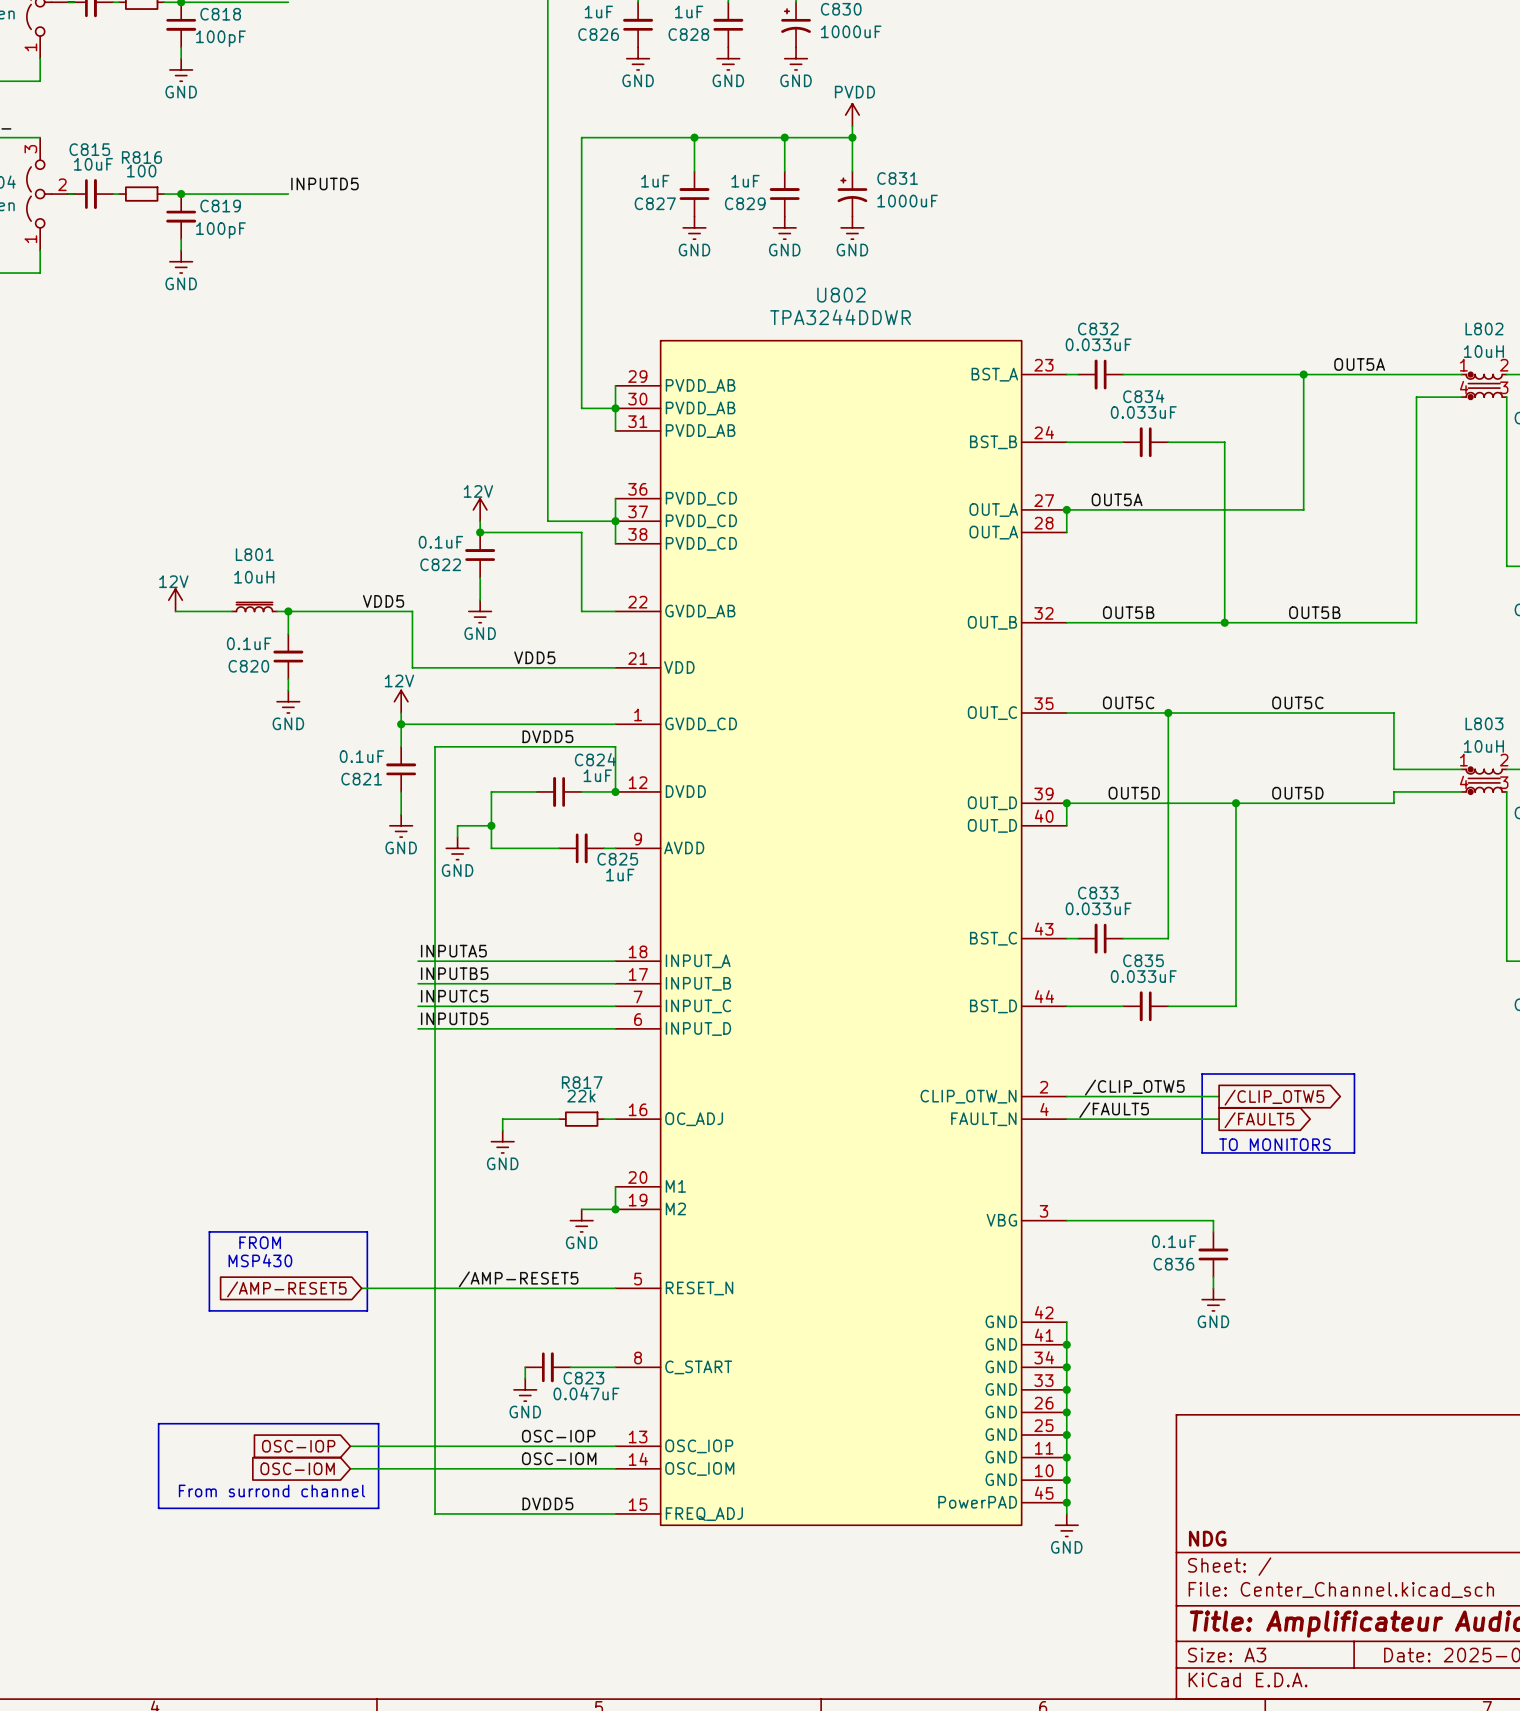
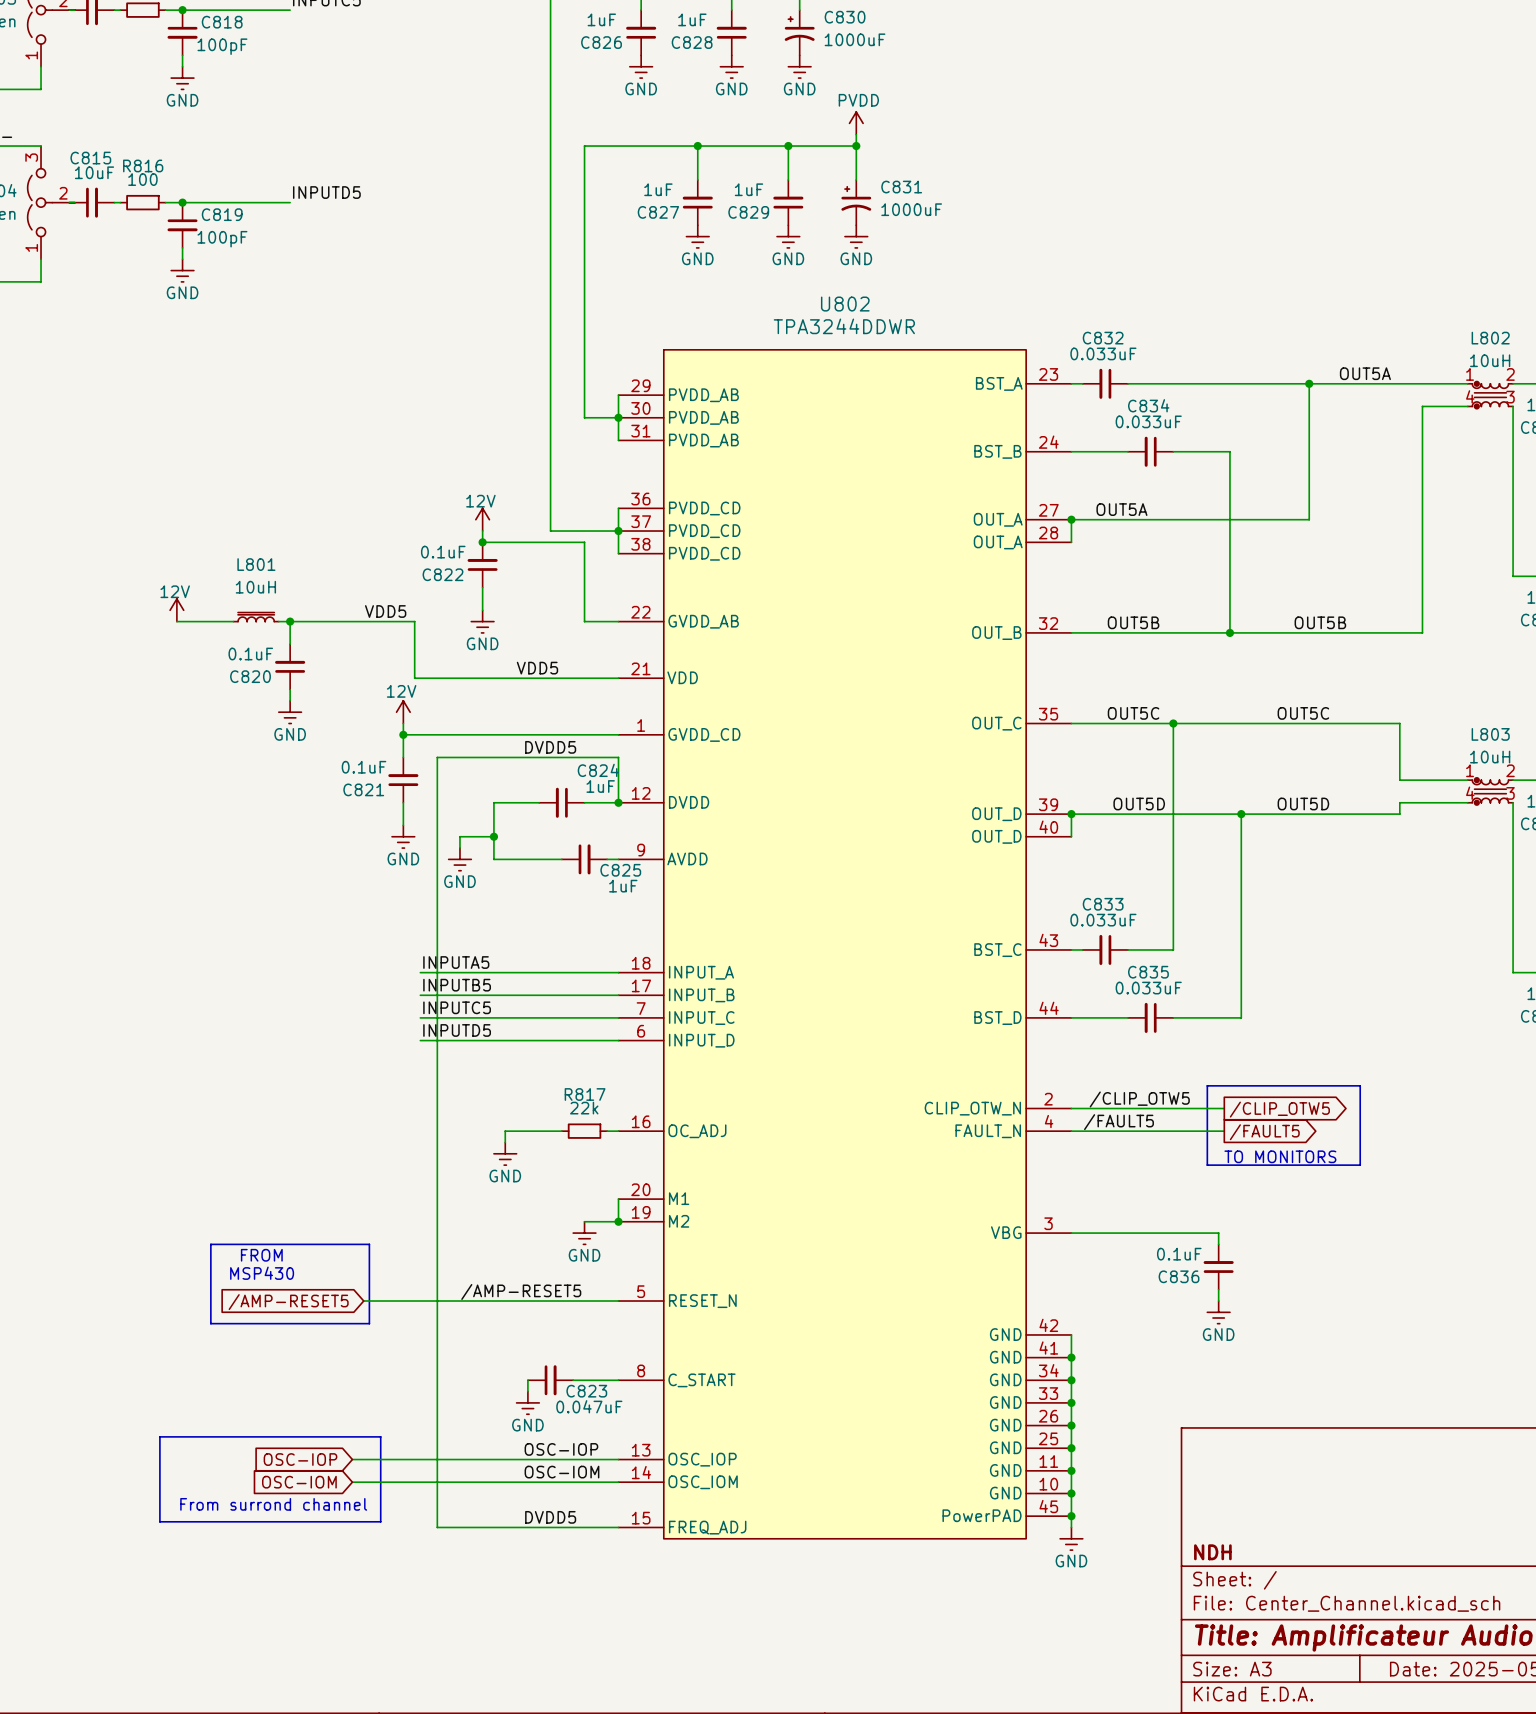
title block: NDG (1207, 1538) -> NDH (1212, 1552)

